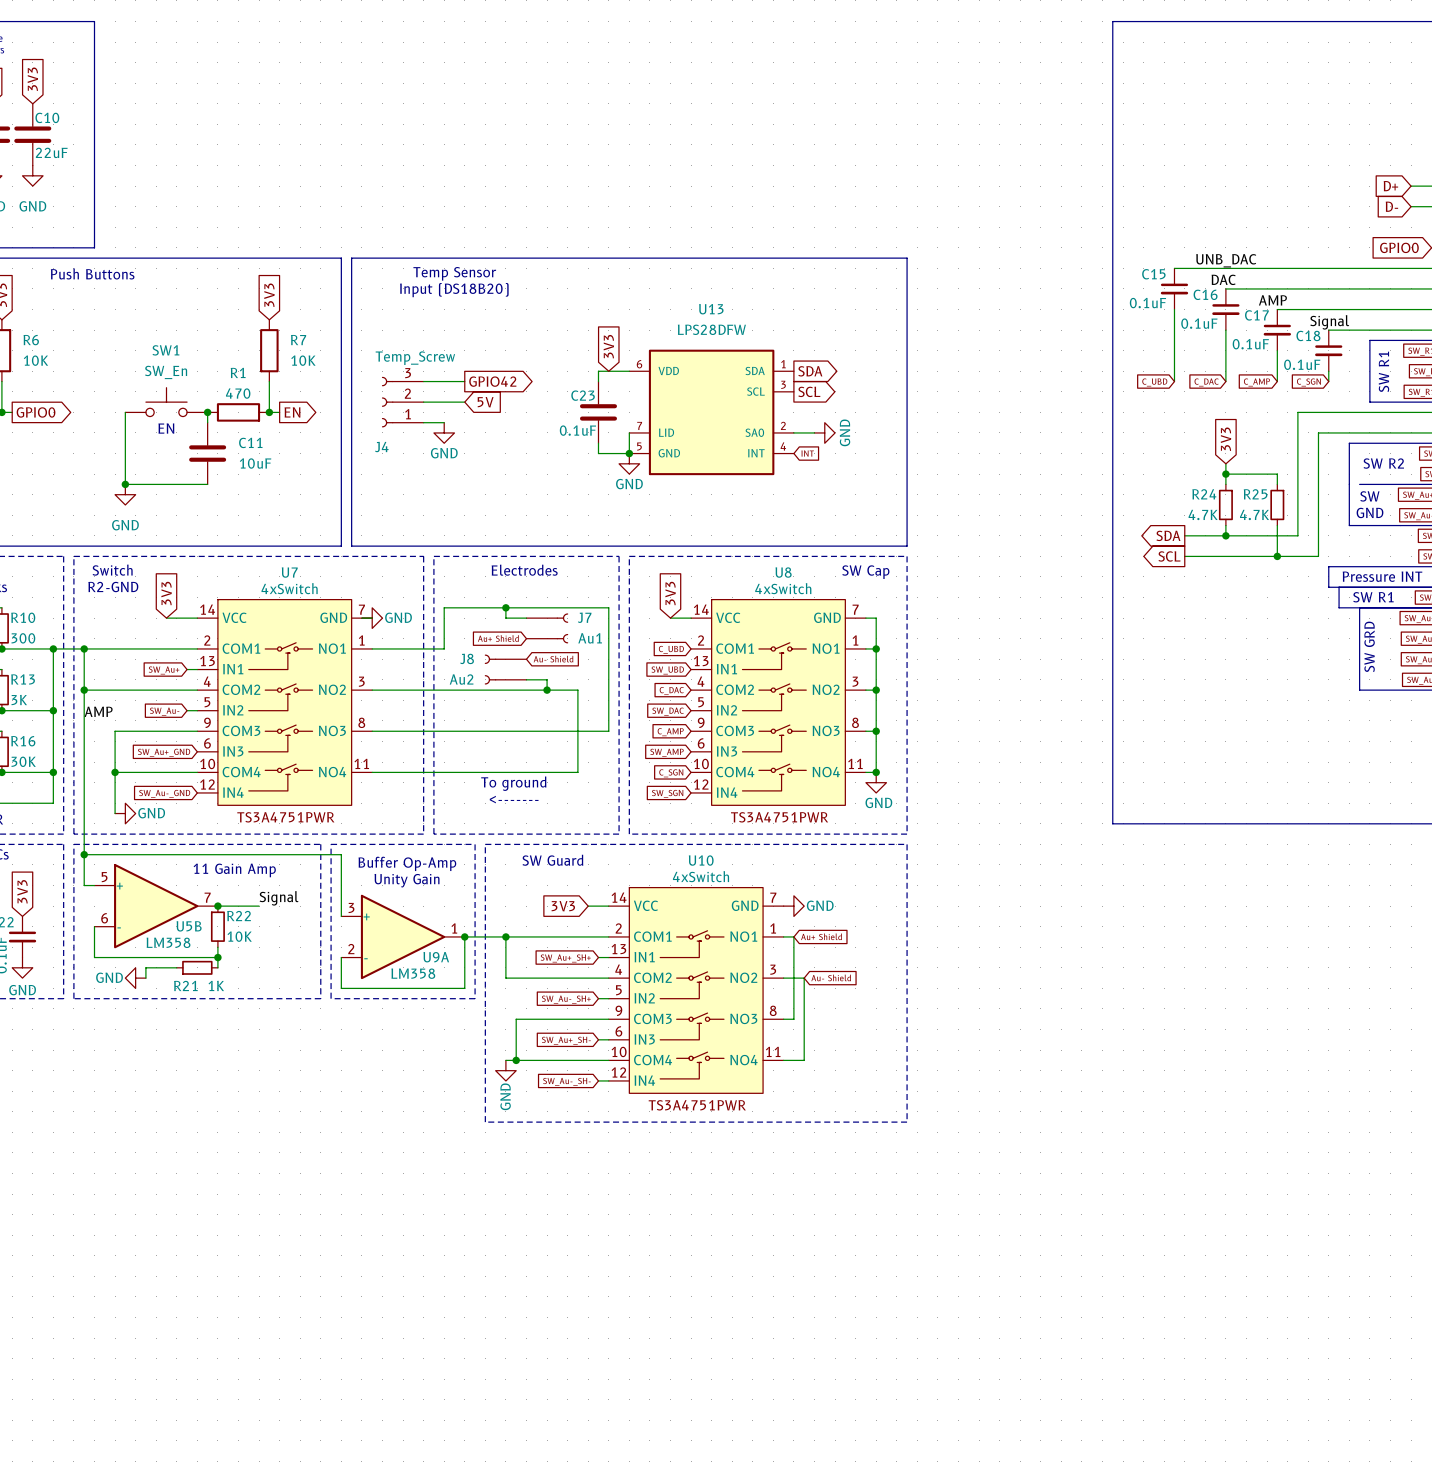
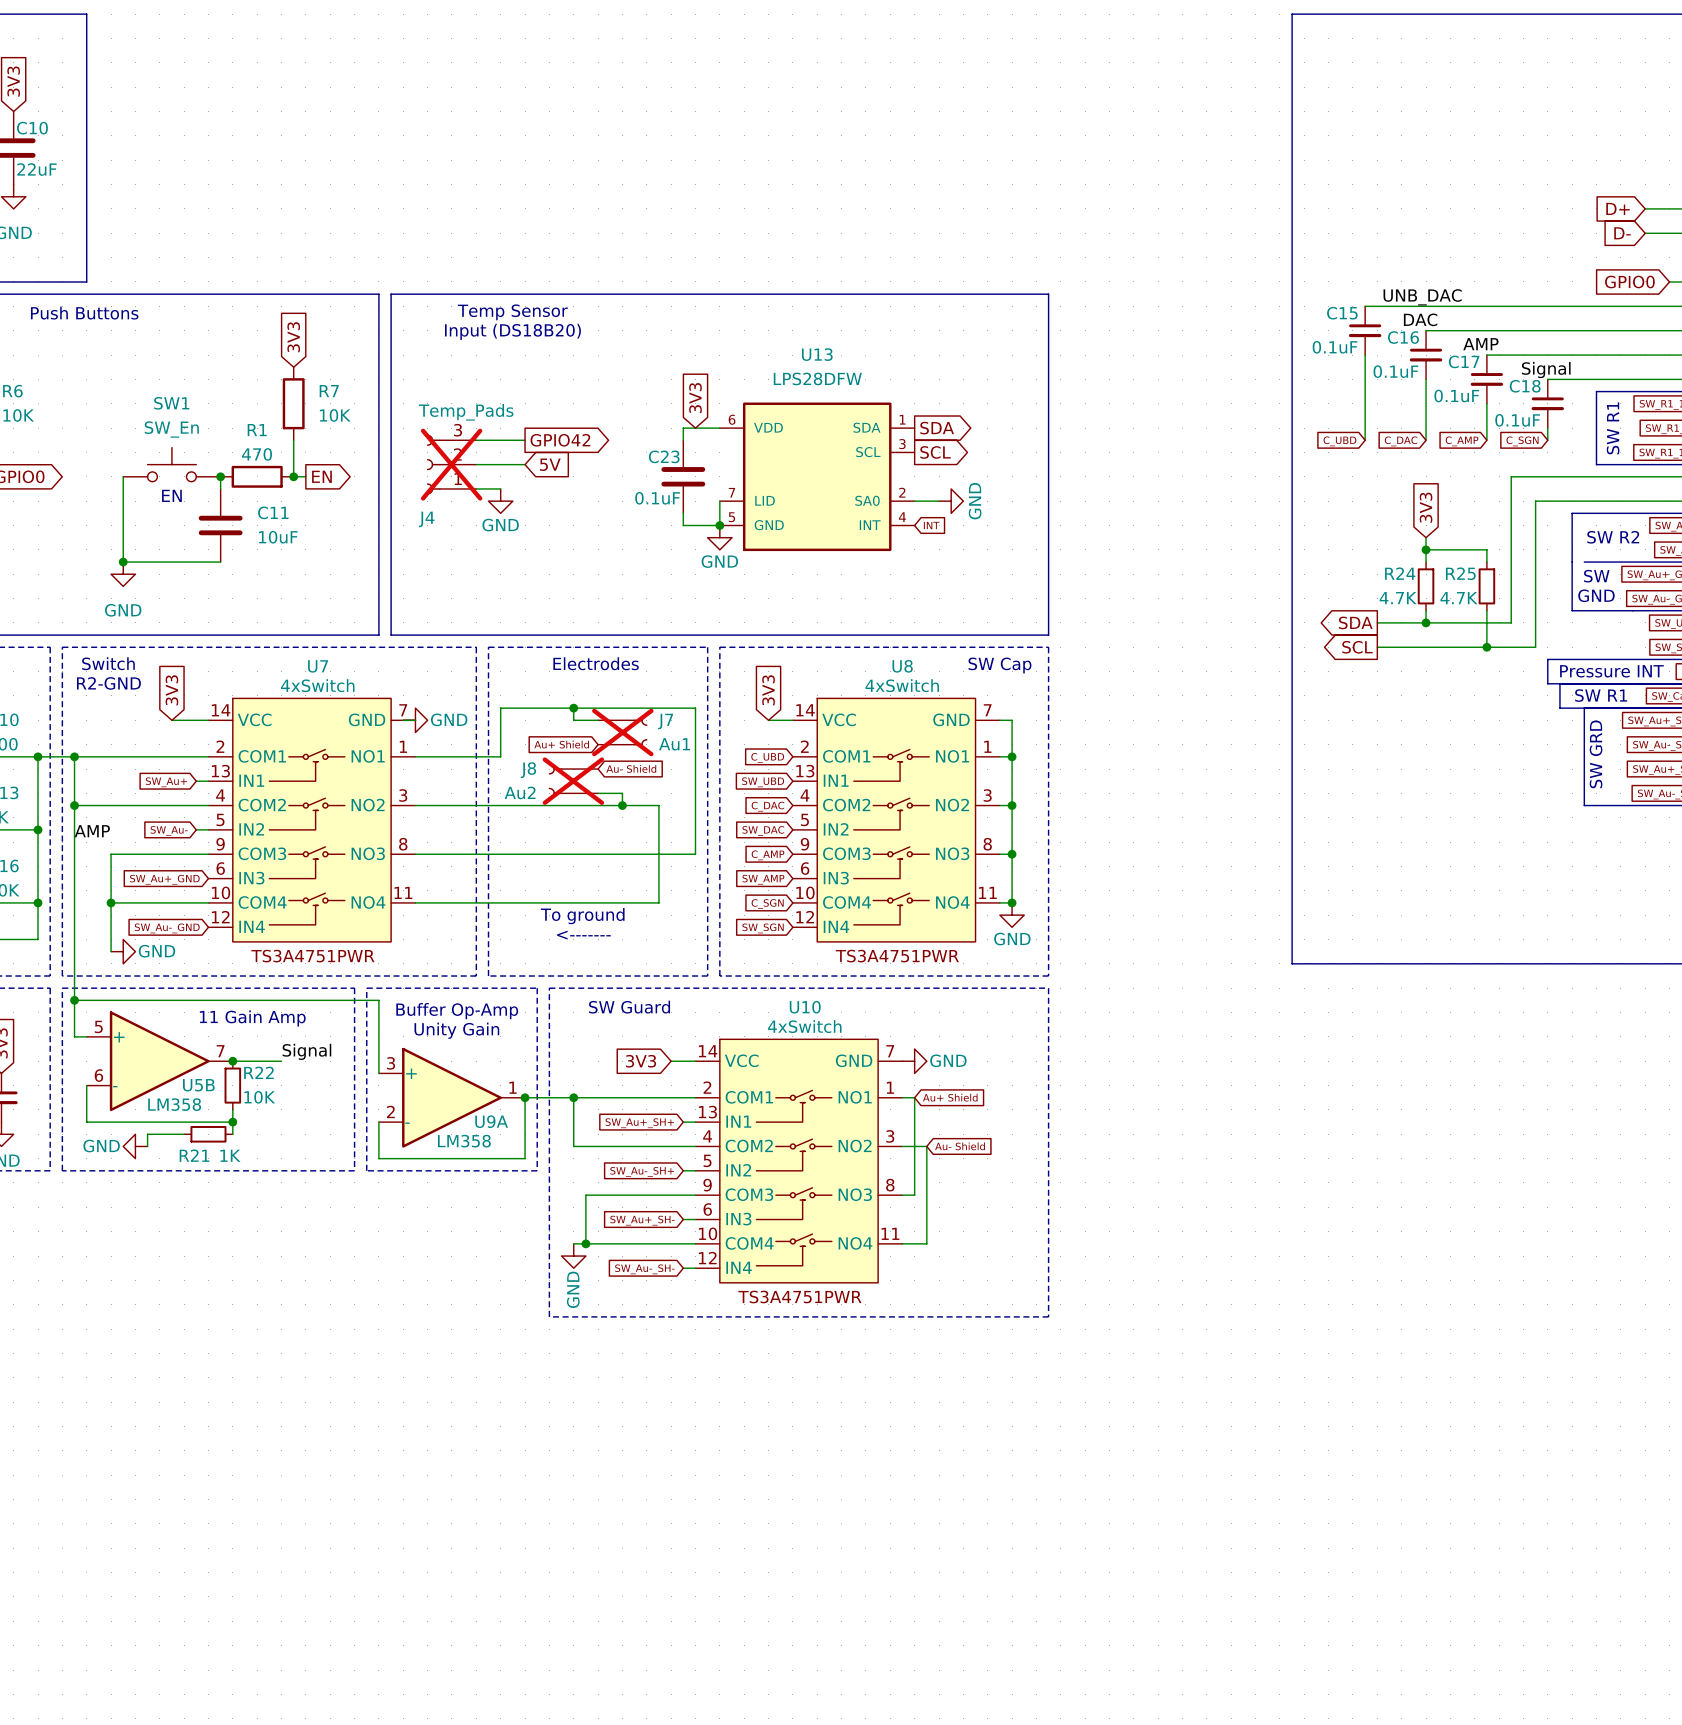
J4 value: Temp_Screw (415, 358) -> Temp_Pads (466, 412)
J4 do-not-place cross: none -> (451, 464)
J7 do-not-place cross: none -> (622, 732)
J8 do-not-place cross: none -> (573, 781)

